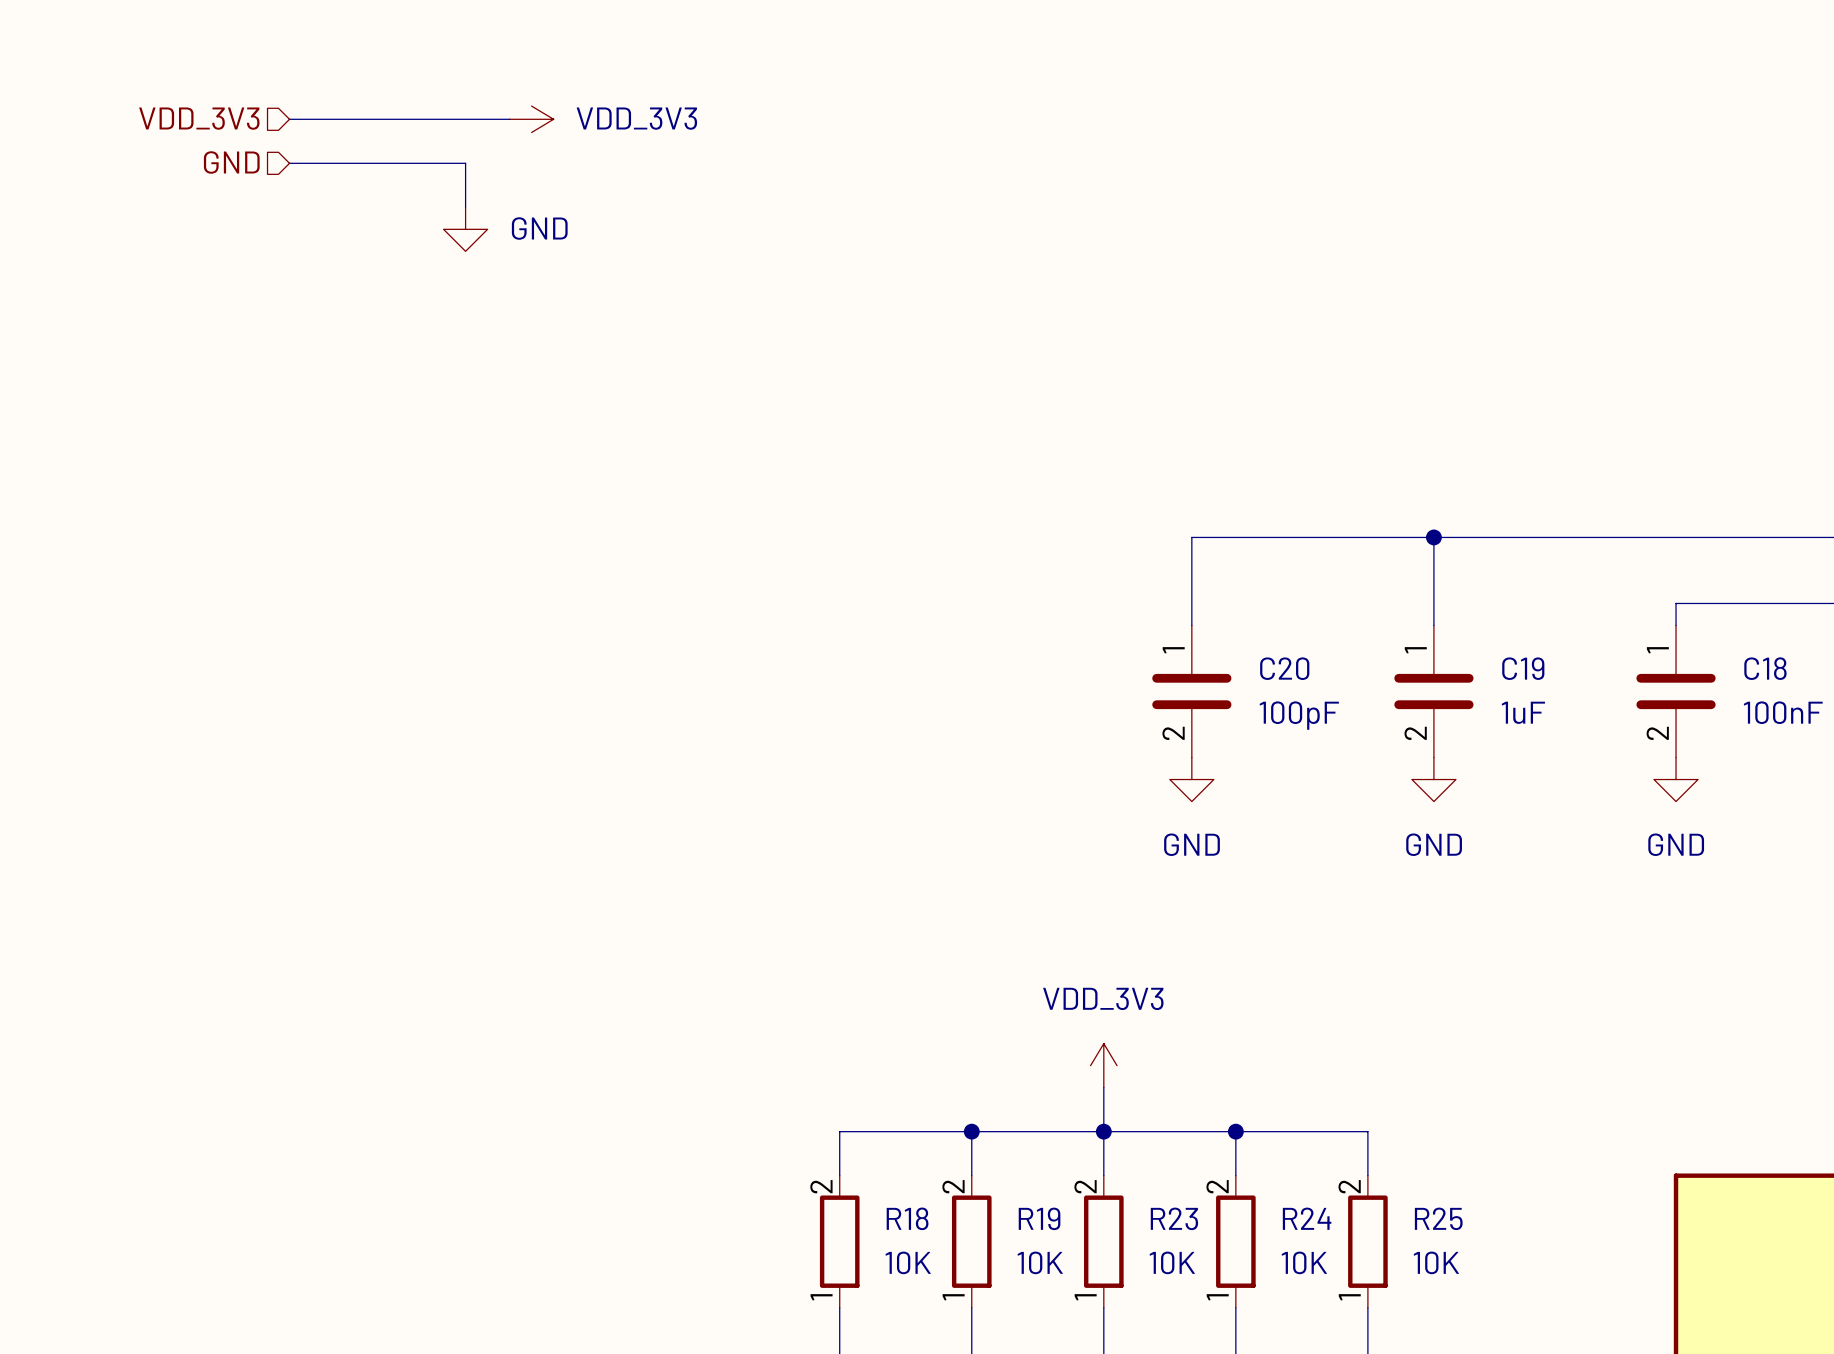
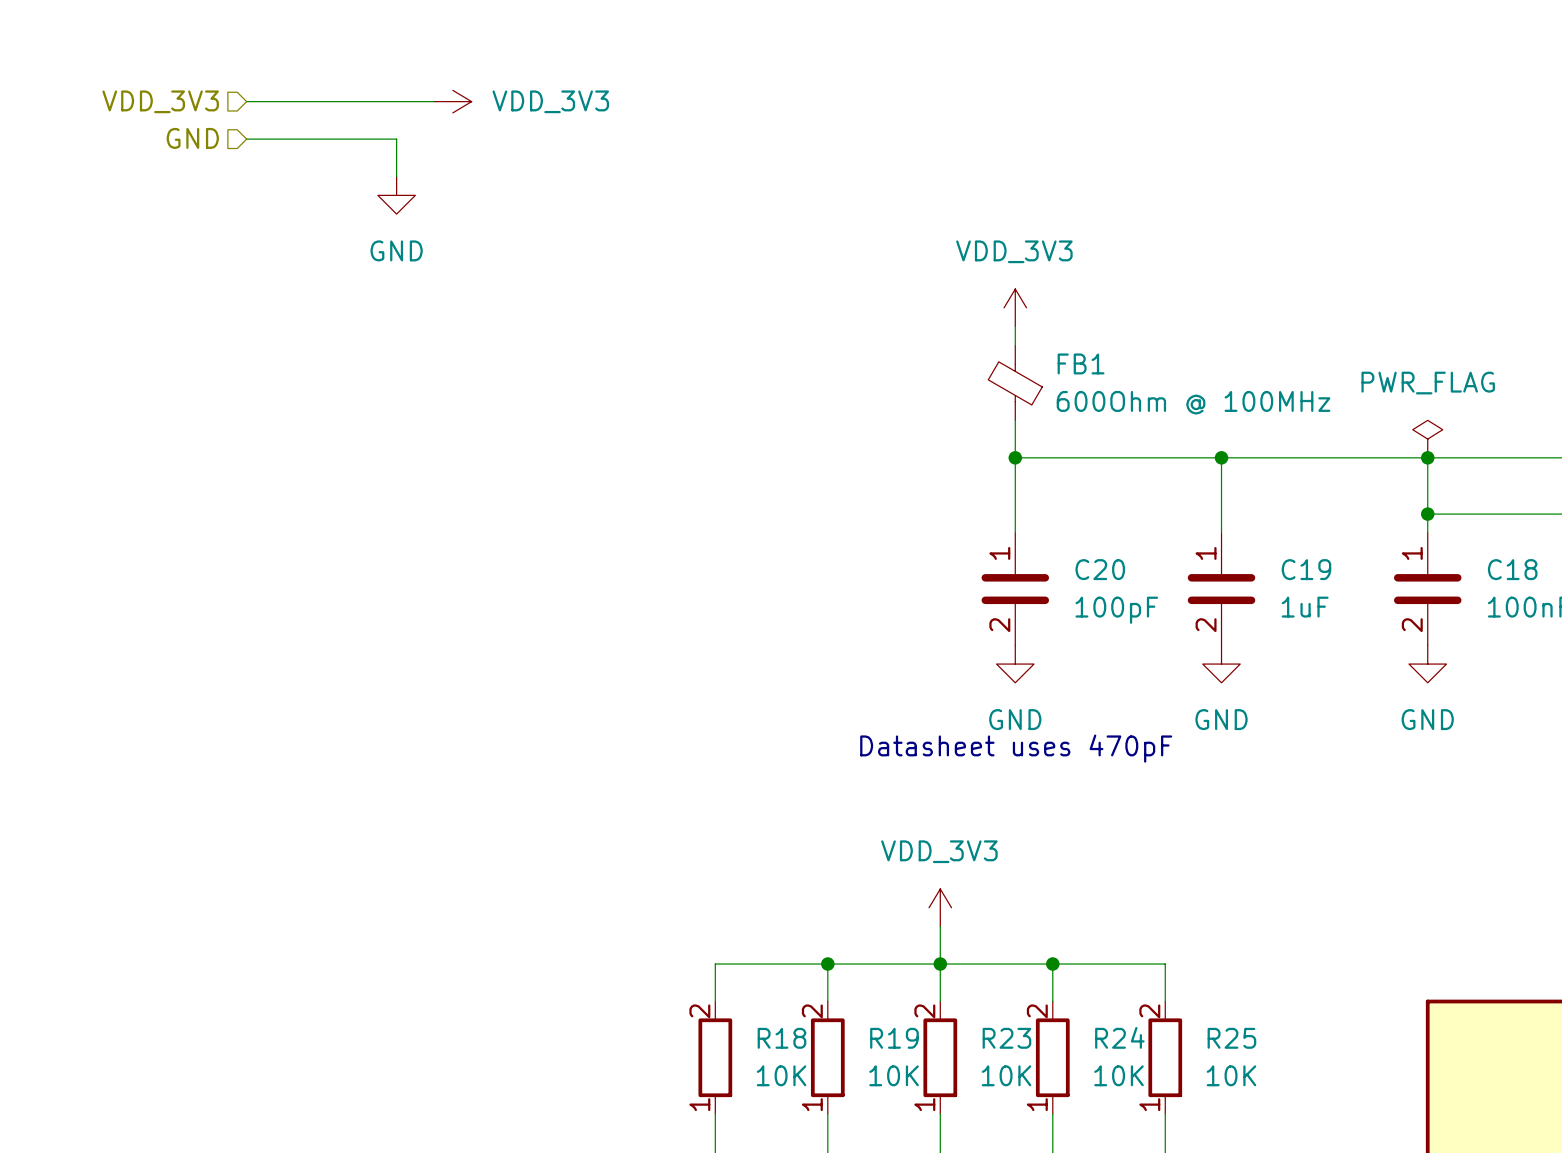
power symbol text position: GND (539, 228) -> GND (396, 250)
power symbol: none -> VDD_3V3 (1015, 307)
wire: none -> (1015, 326) (1015, 345)
FB1: none -> 600Ohm @ 100MHz (1015, 382)
wire: none -> (1015, 420) (1015, 457)
power symbol: none -> PWR_FLAG (1427, 439)
junction: none -> (1015, 457)
wire: none -> (1427, 457) (1427, 514)
junction: none -> (1427, 457)
junction: none -> (1427, 514)
text: none -> Datasheet uses 470pF (1016, 748)

